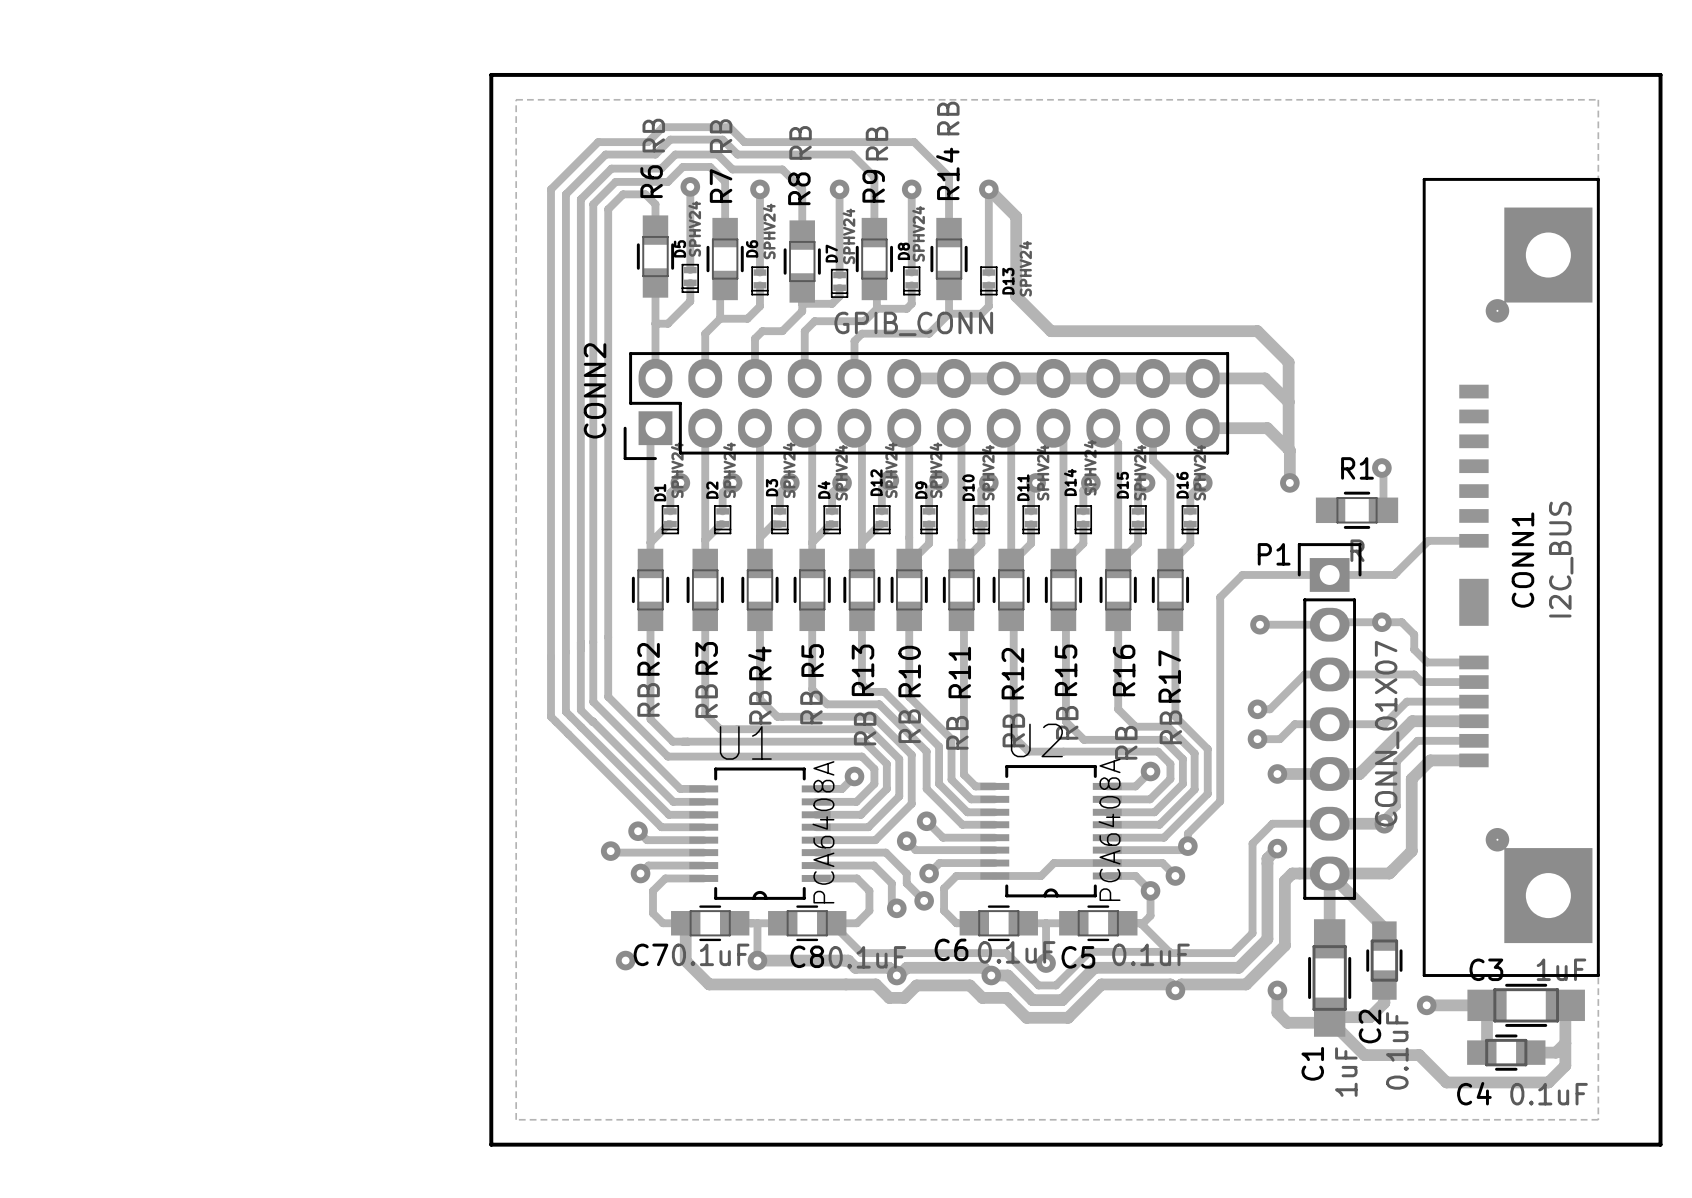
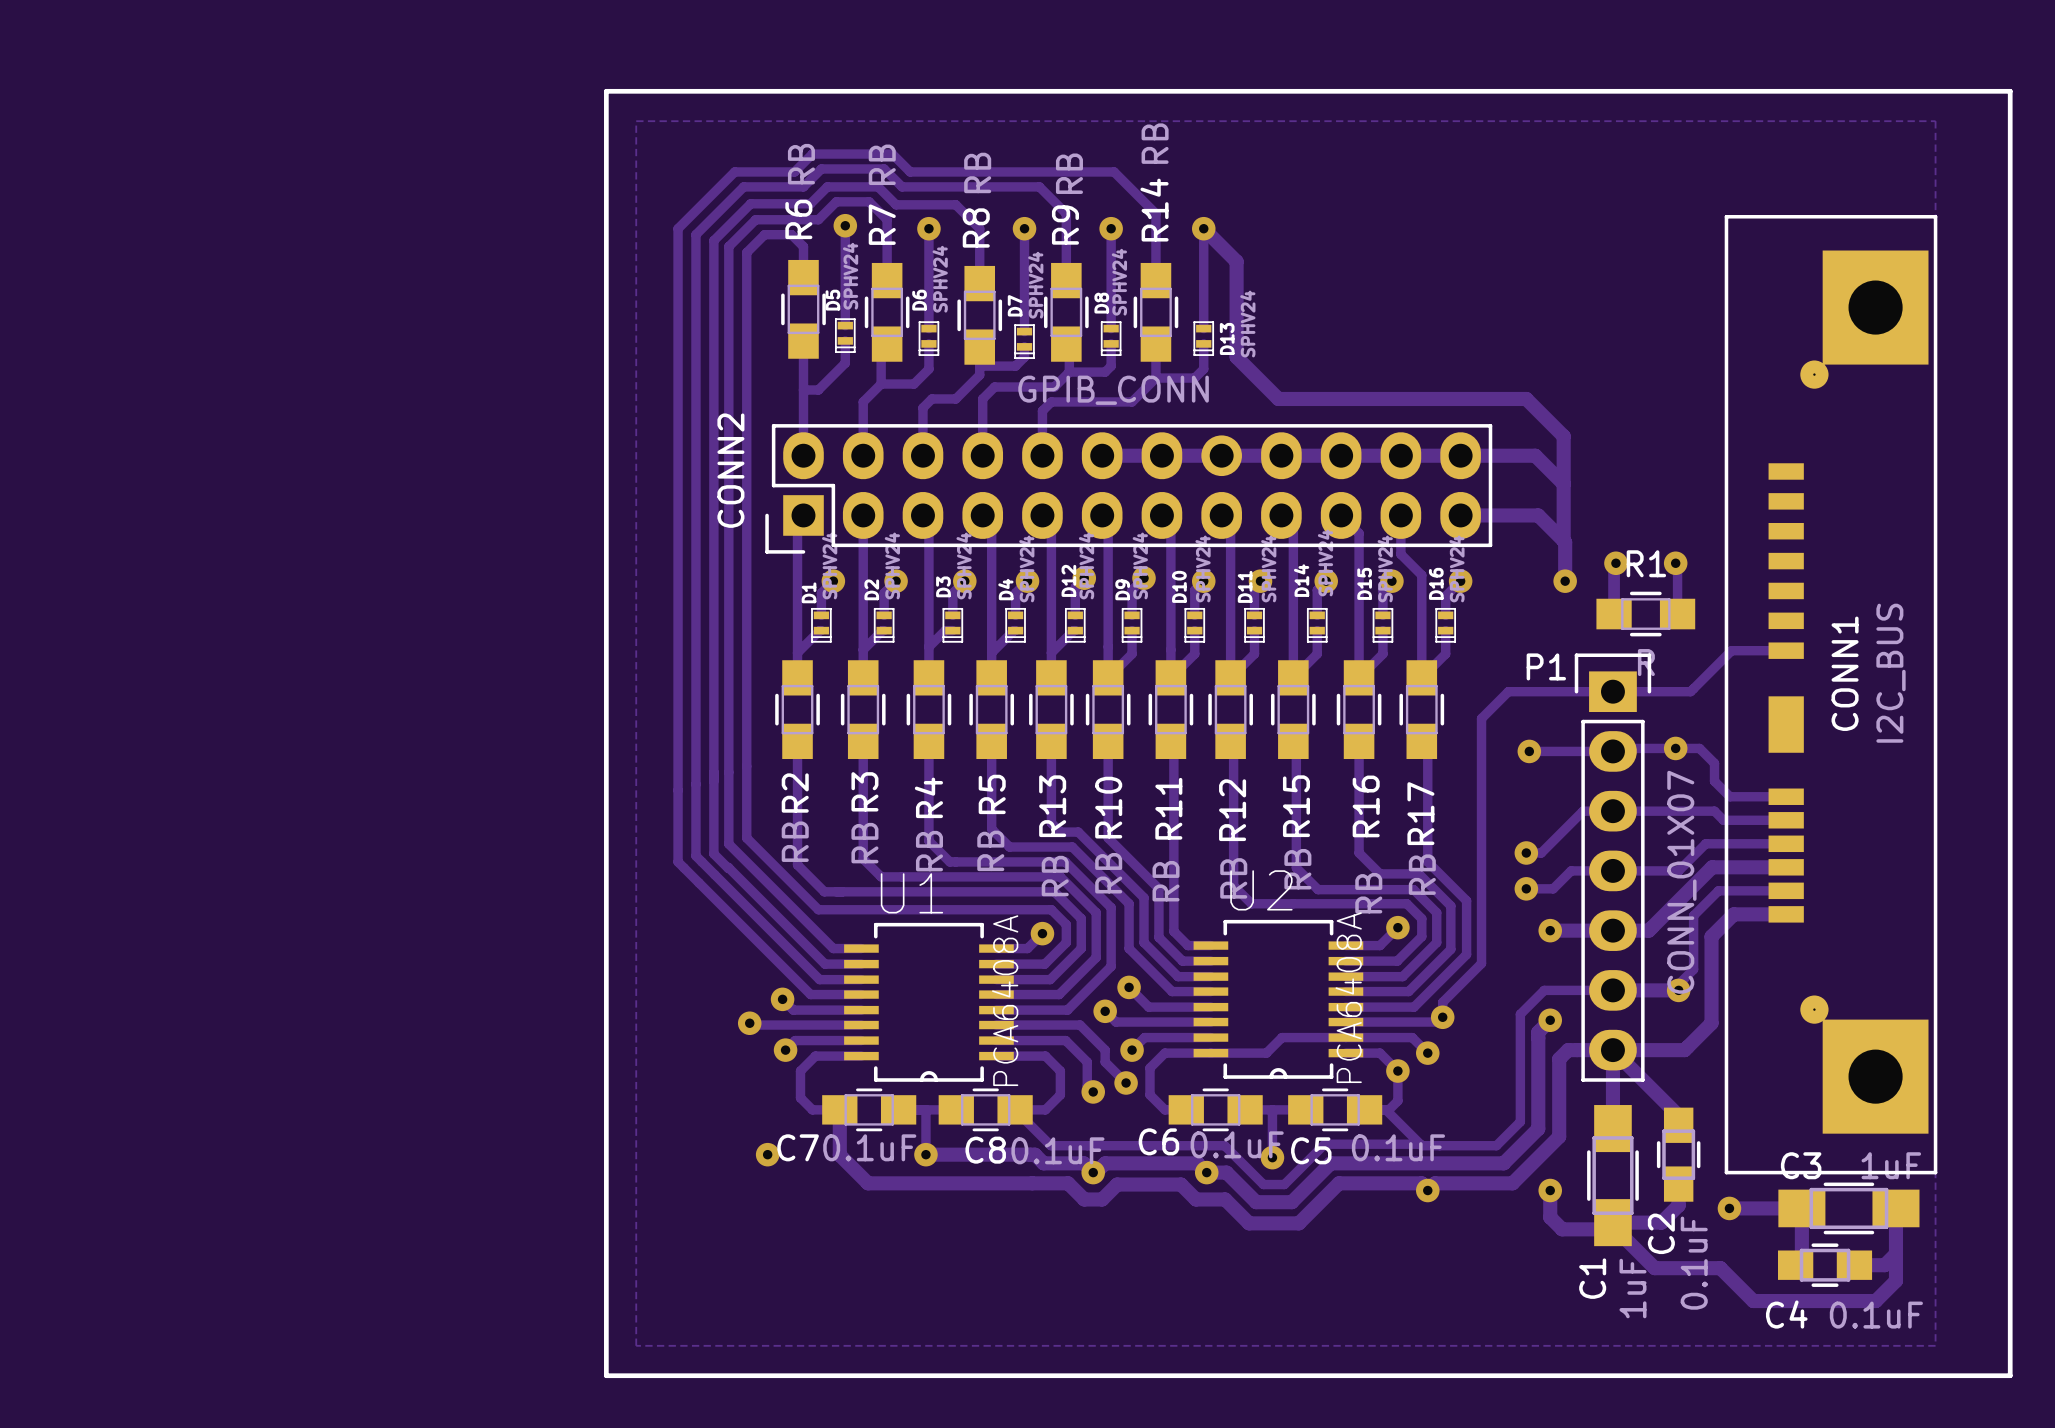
track: none -> (1615, 563) (1614, 565) (1614, 614)
via: none -> (1615, 563)

